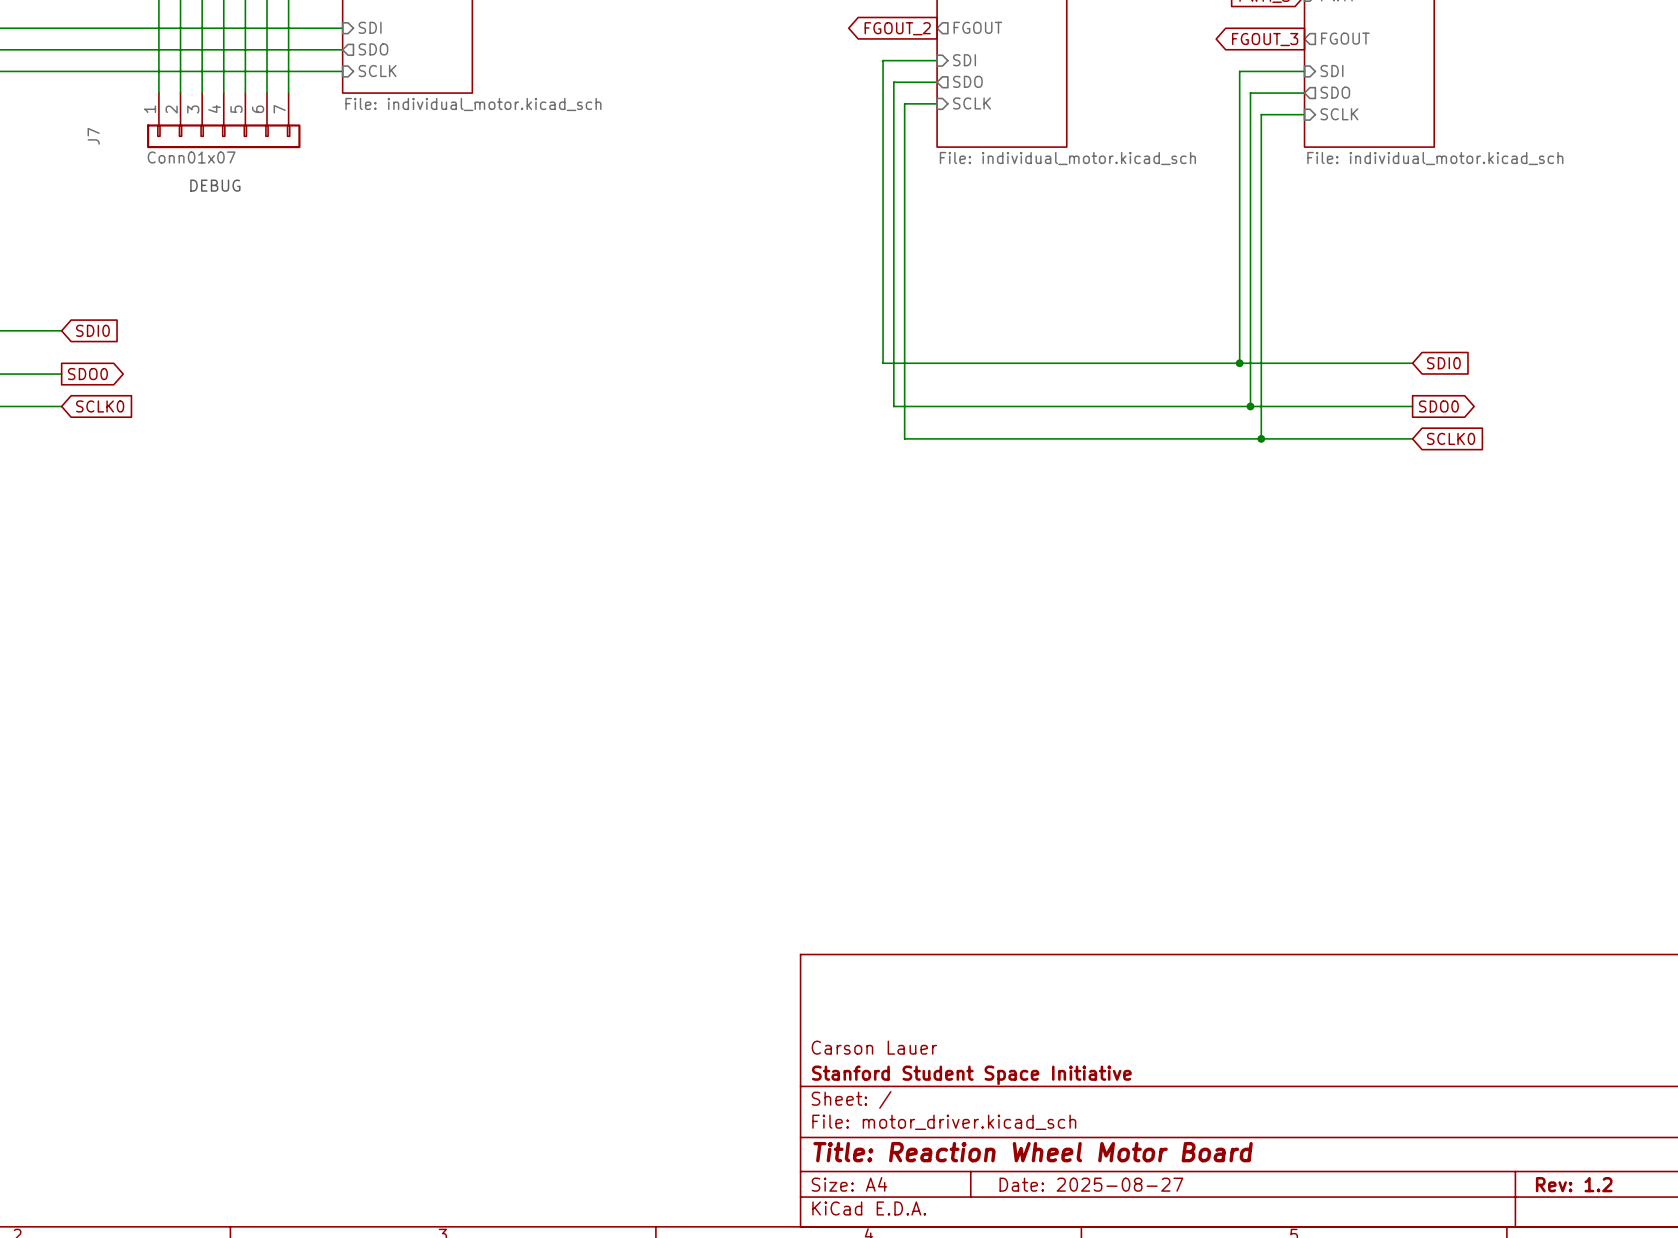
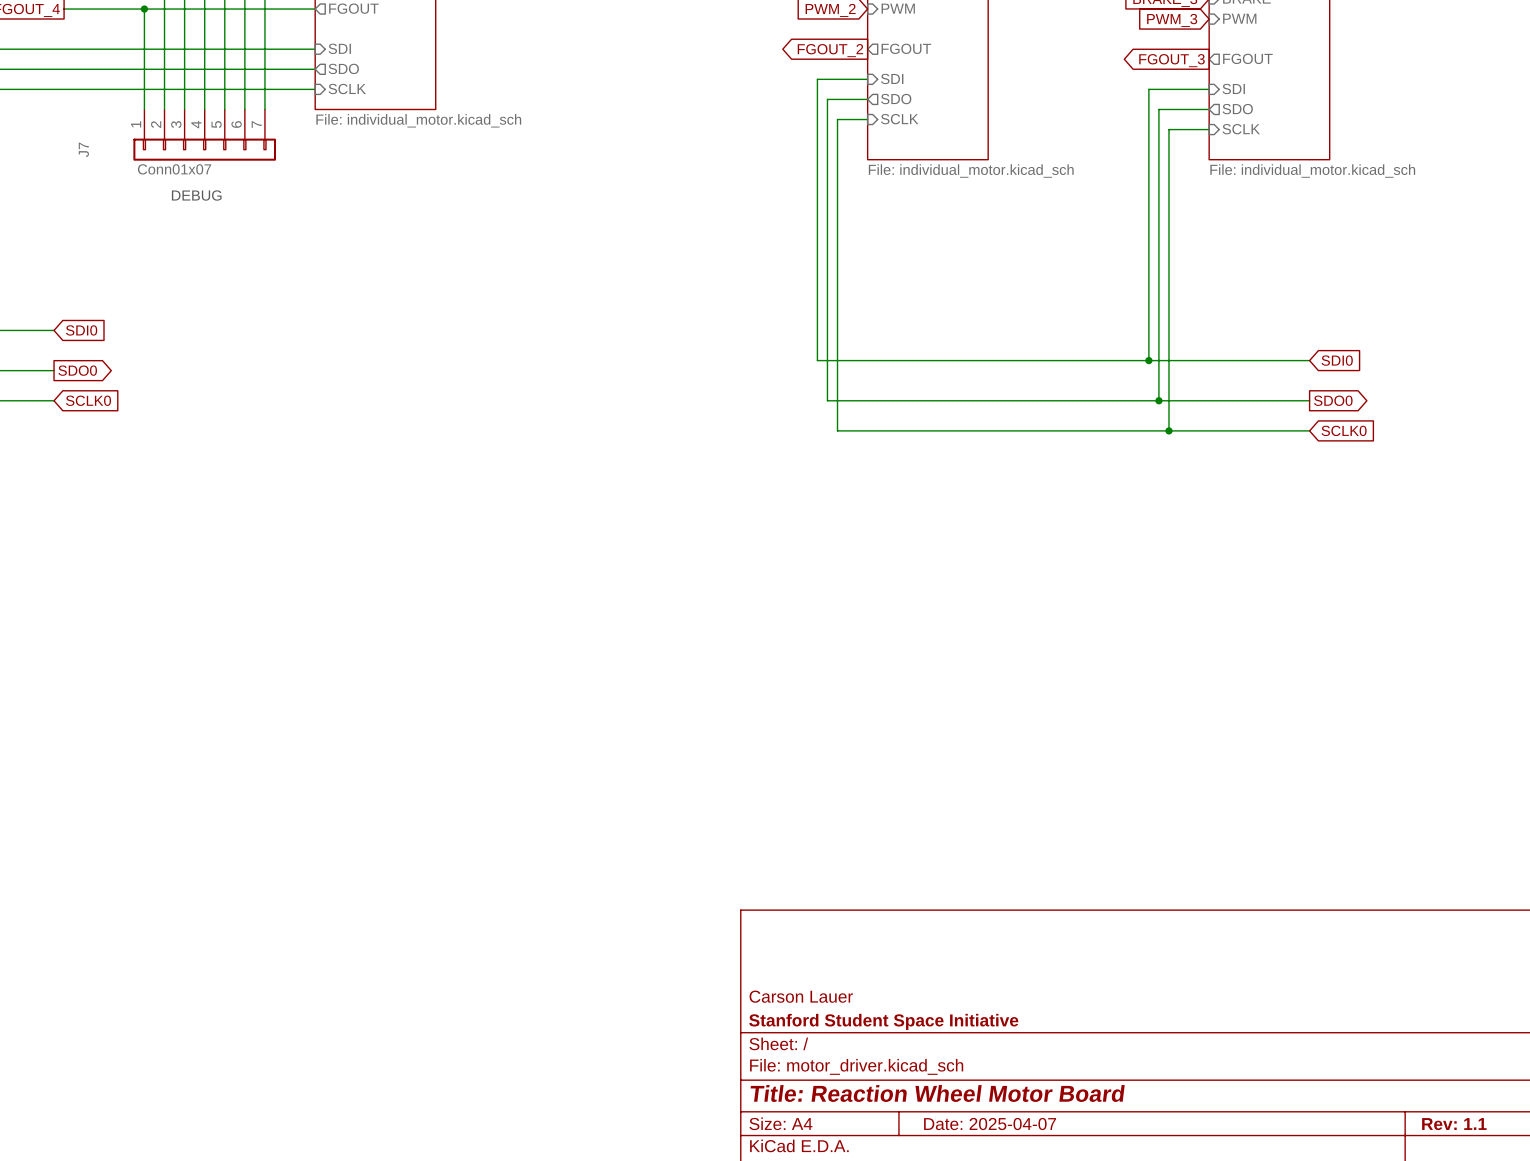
title block: Date: 2025-08-27 (1091, 1184) -> Date: 2025-04-07 (990, 1124)
title block: Rev: 1.2 (1574, 1184) -> Rev: 1.1 (1454, 1124)

